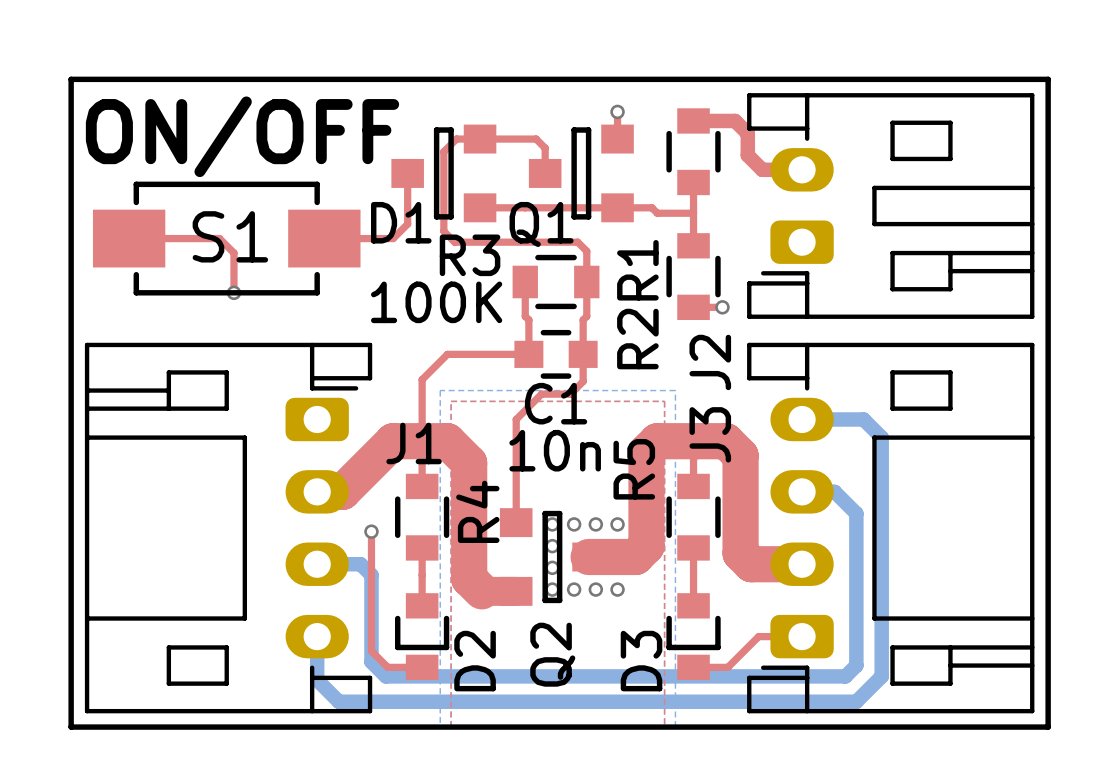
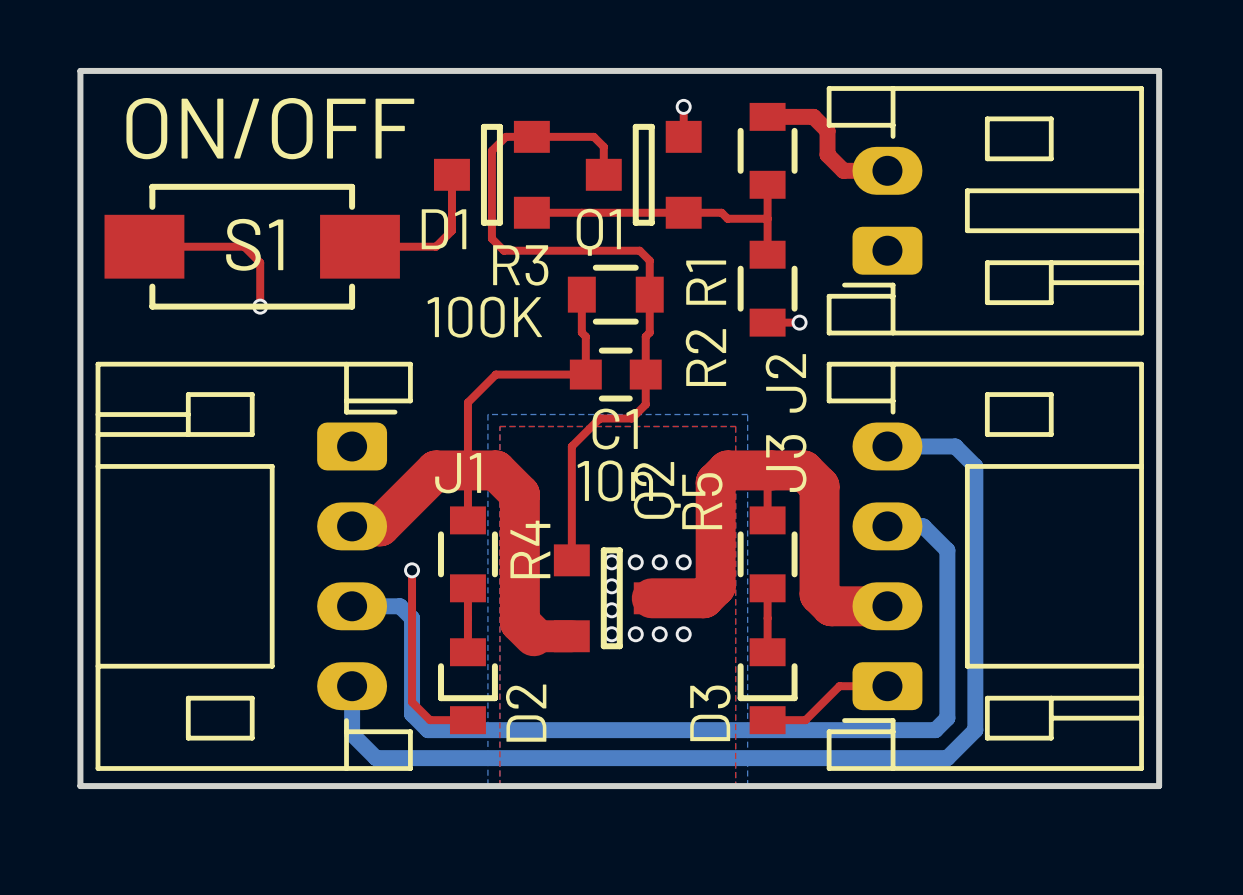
Q2 name position: Q2 (552, 654) -> Q2 (657, 490)

